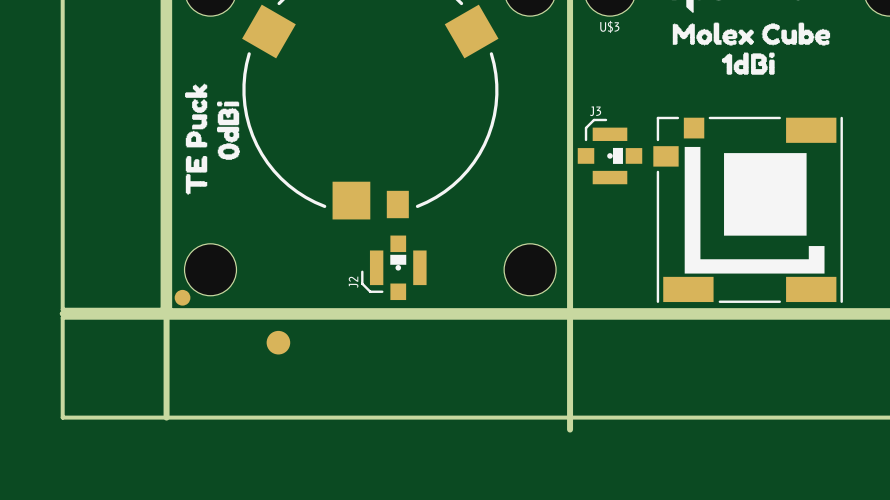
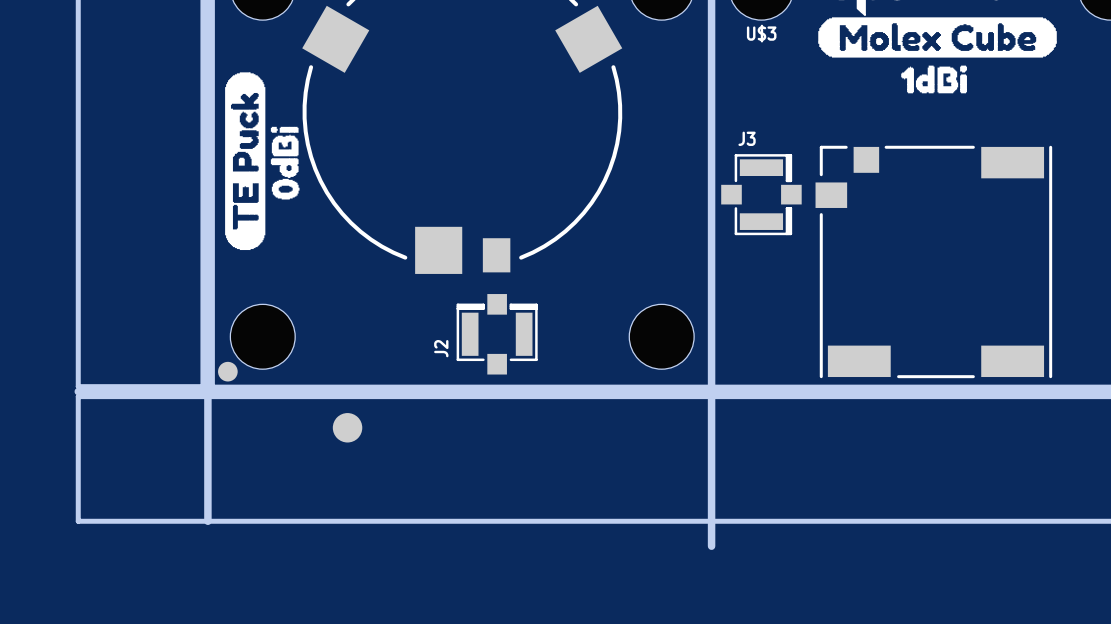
drawing shape: [672, 22, 831, 46] -> [818, 17, 1057, 58]
drawing shape: [185, 83, 208, 195] -> [225, 72, 266, 251]
part footprint: [653, 116, 843, 303] -> [815, 145, 1053, 379]
J3 footprint: [577, 118, 643, 185] -> [721, 154, 802, 236]
J2 footprint: [361, 235, 427, 301] -> [456, 294, 538, 375]
board edge: none -> (711, 536) (711, 546)

